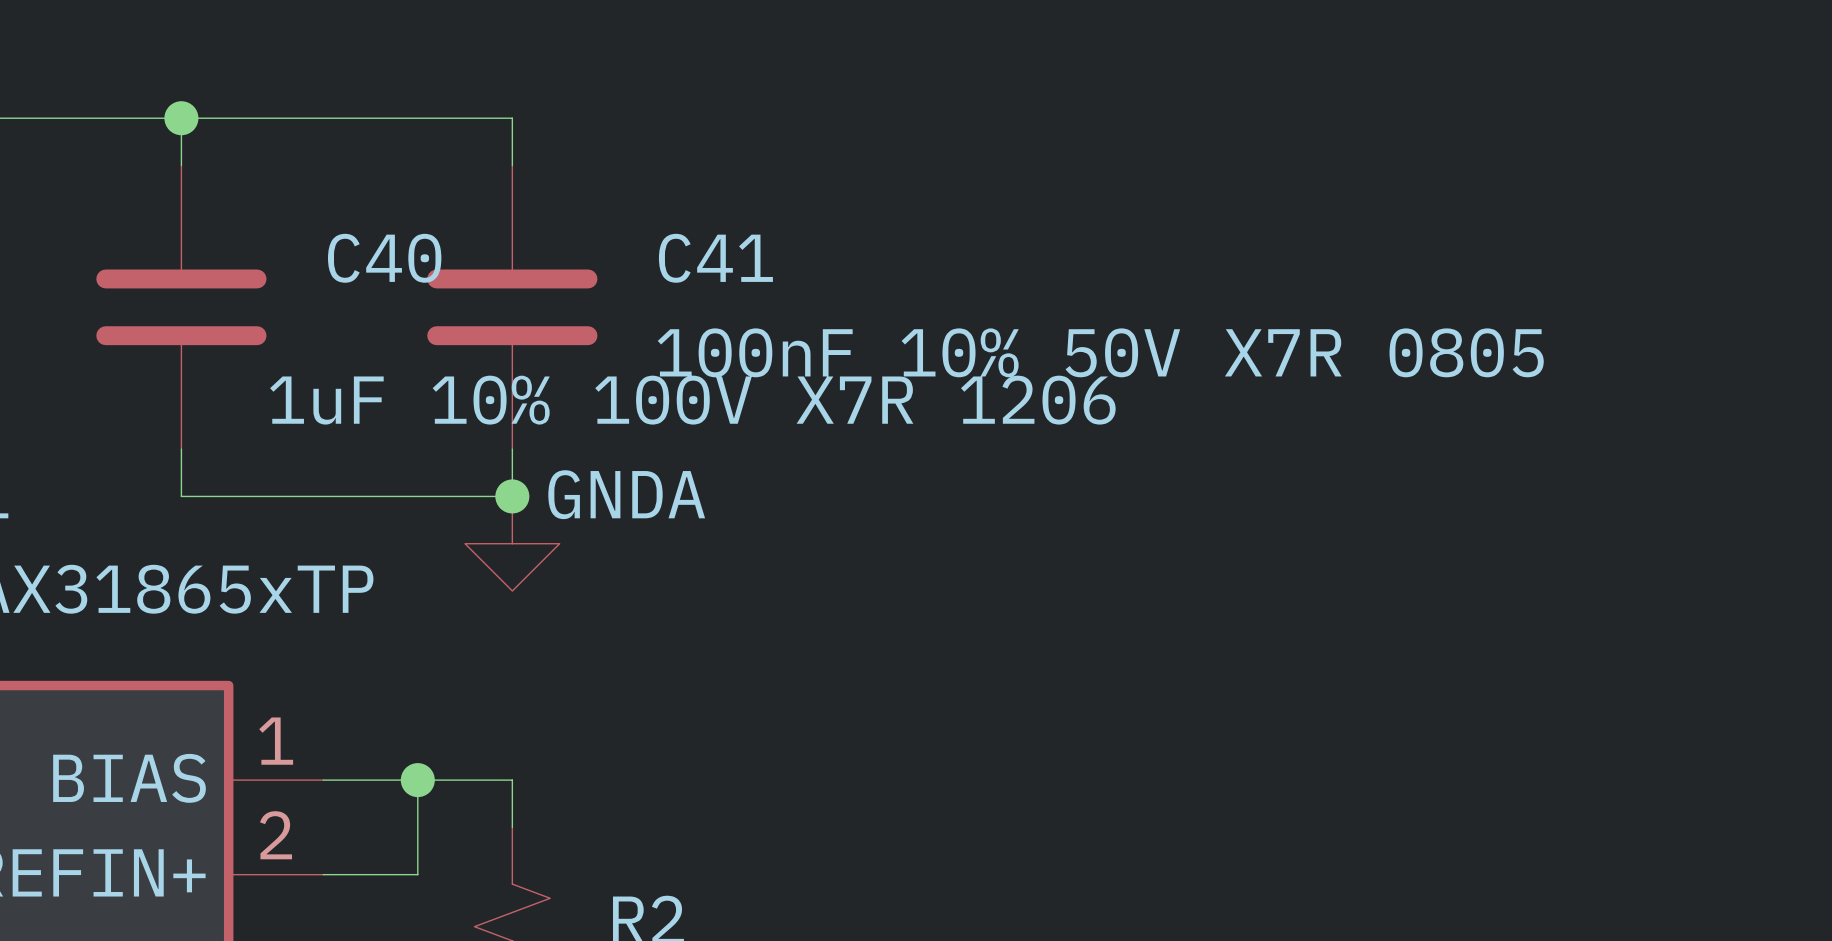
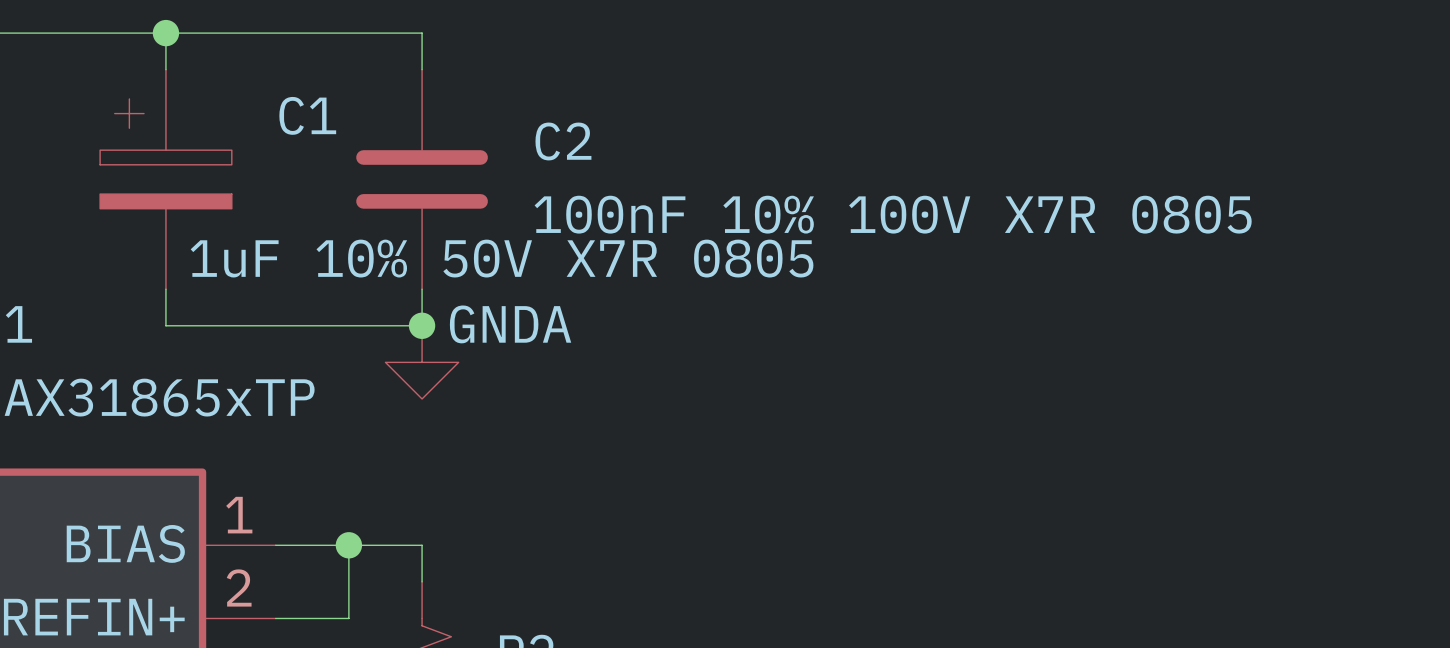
C41 name: C41 (715, 258) -> C2 (563, 141)
C40: 1uF 10% 100V X7R 1206 (181, 307) -> none
C1: none -> 1uF 10% 50V X7R 0805 (165, 179)
C41 value: 100nF 10% 50V X7R 0805 (1100, 352) -> 100nF 10% 100V X7R 0805 (893, 214)

